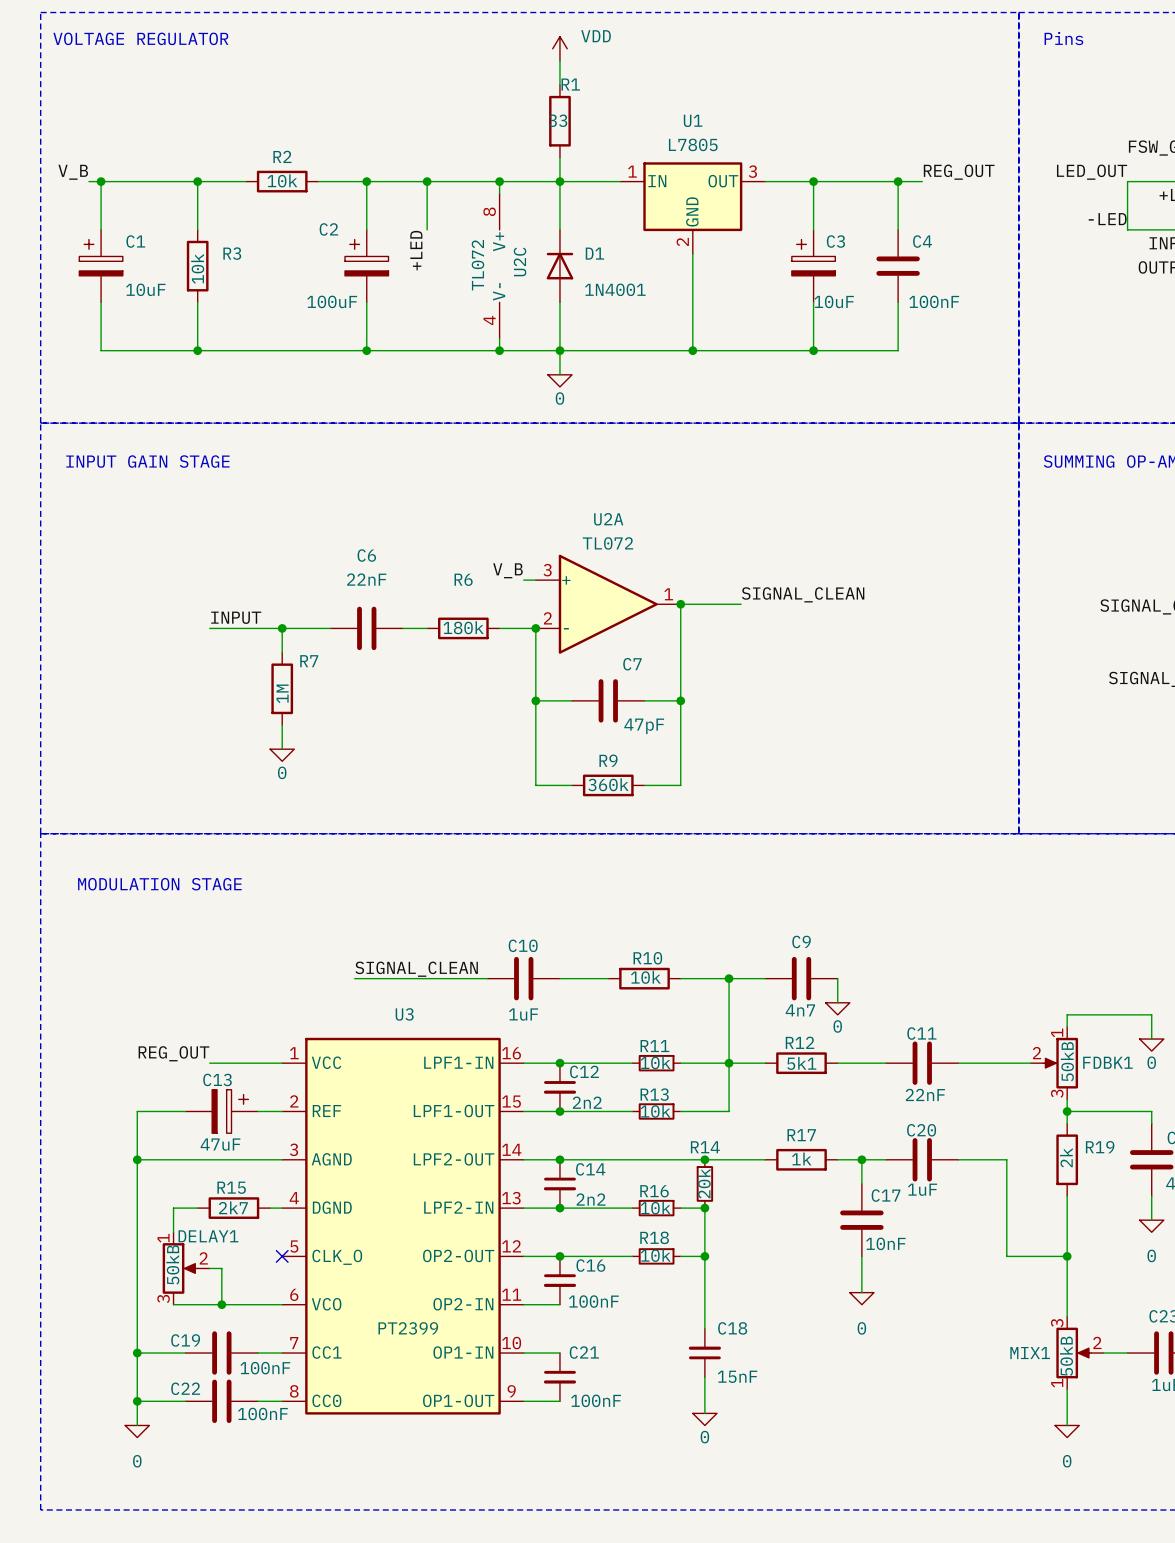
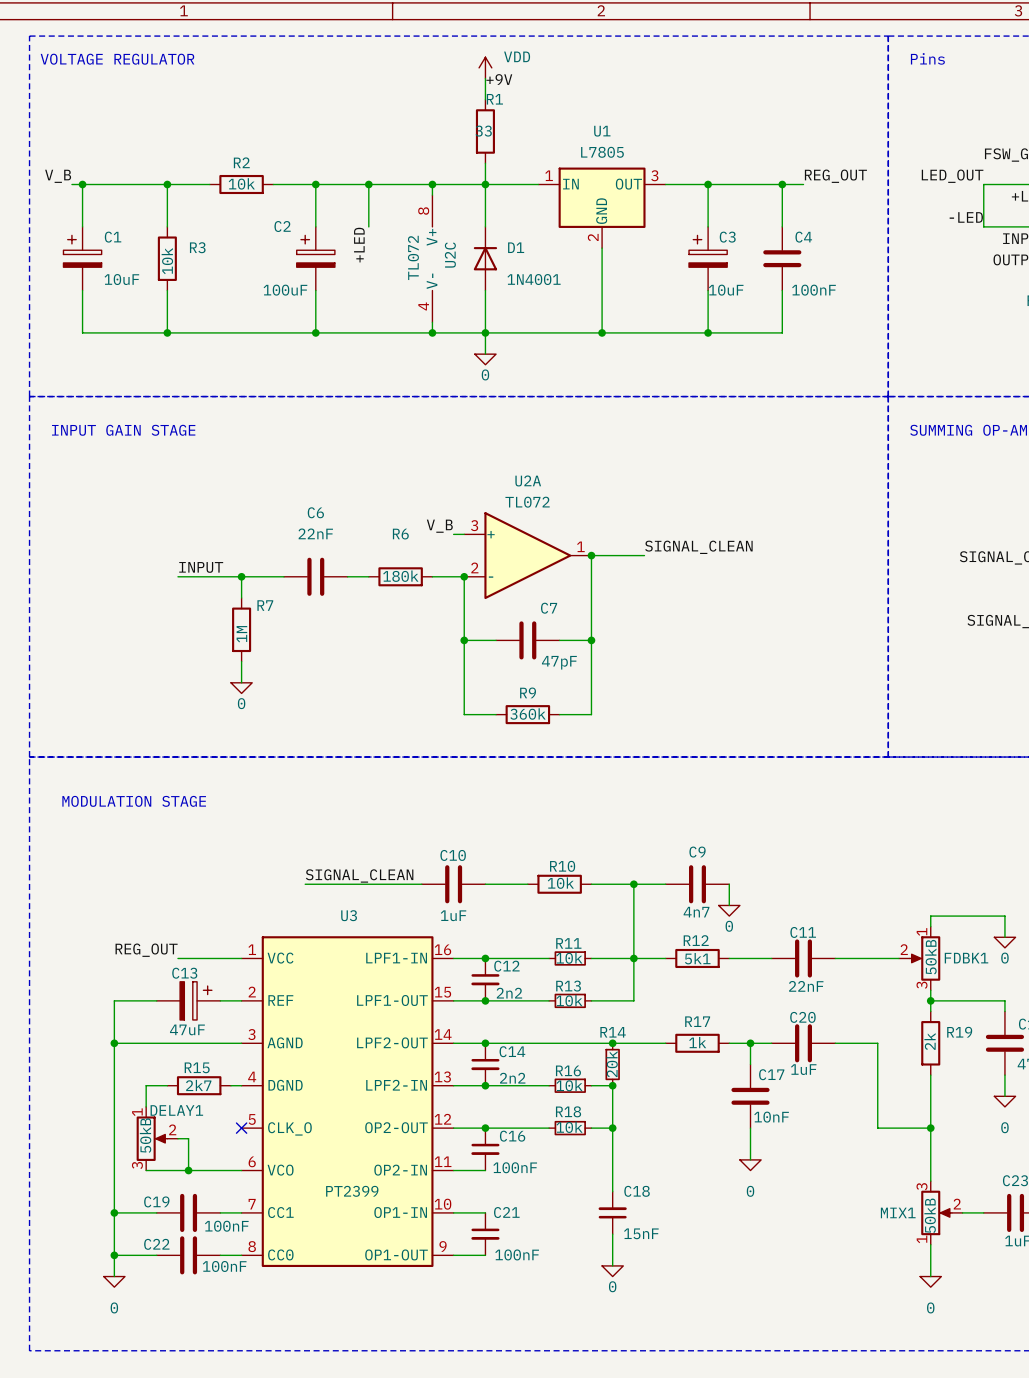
label: none -> +9V (499, 79)

